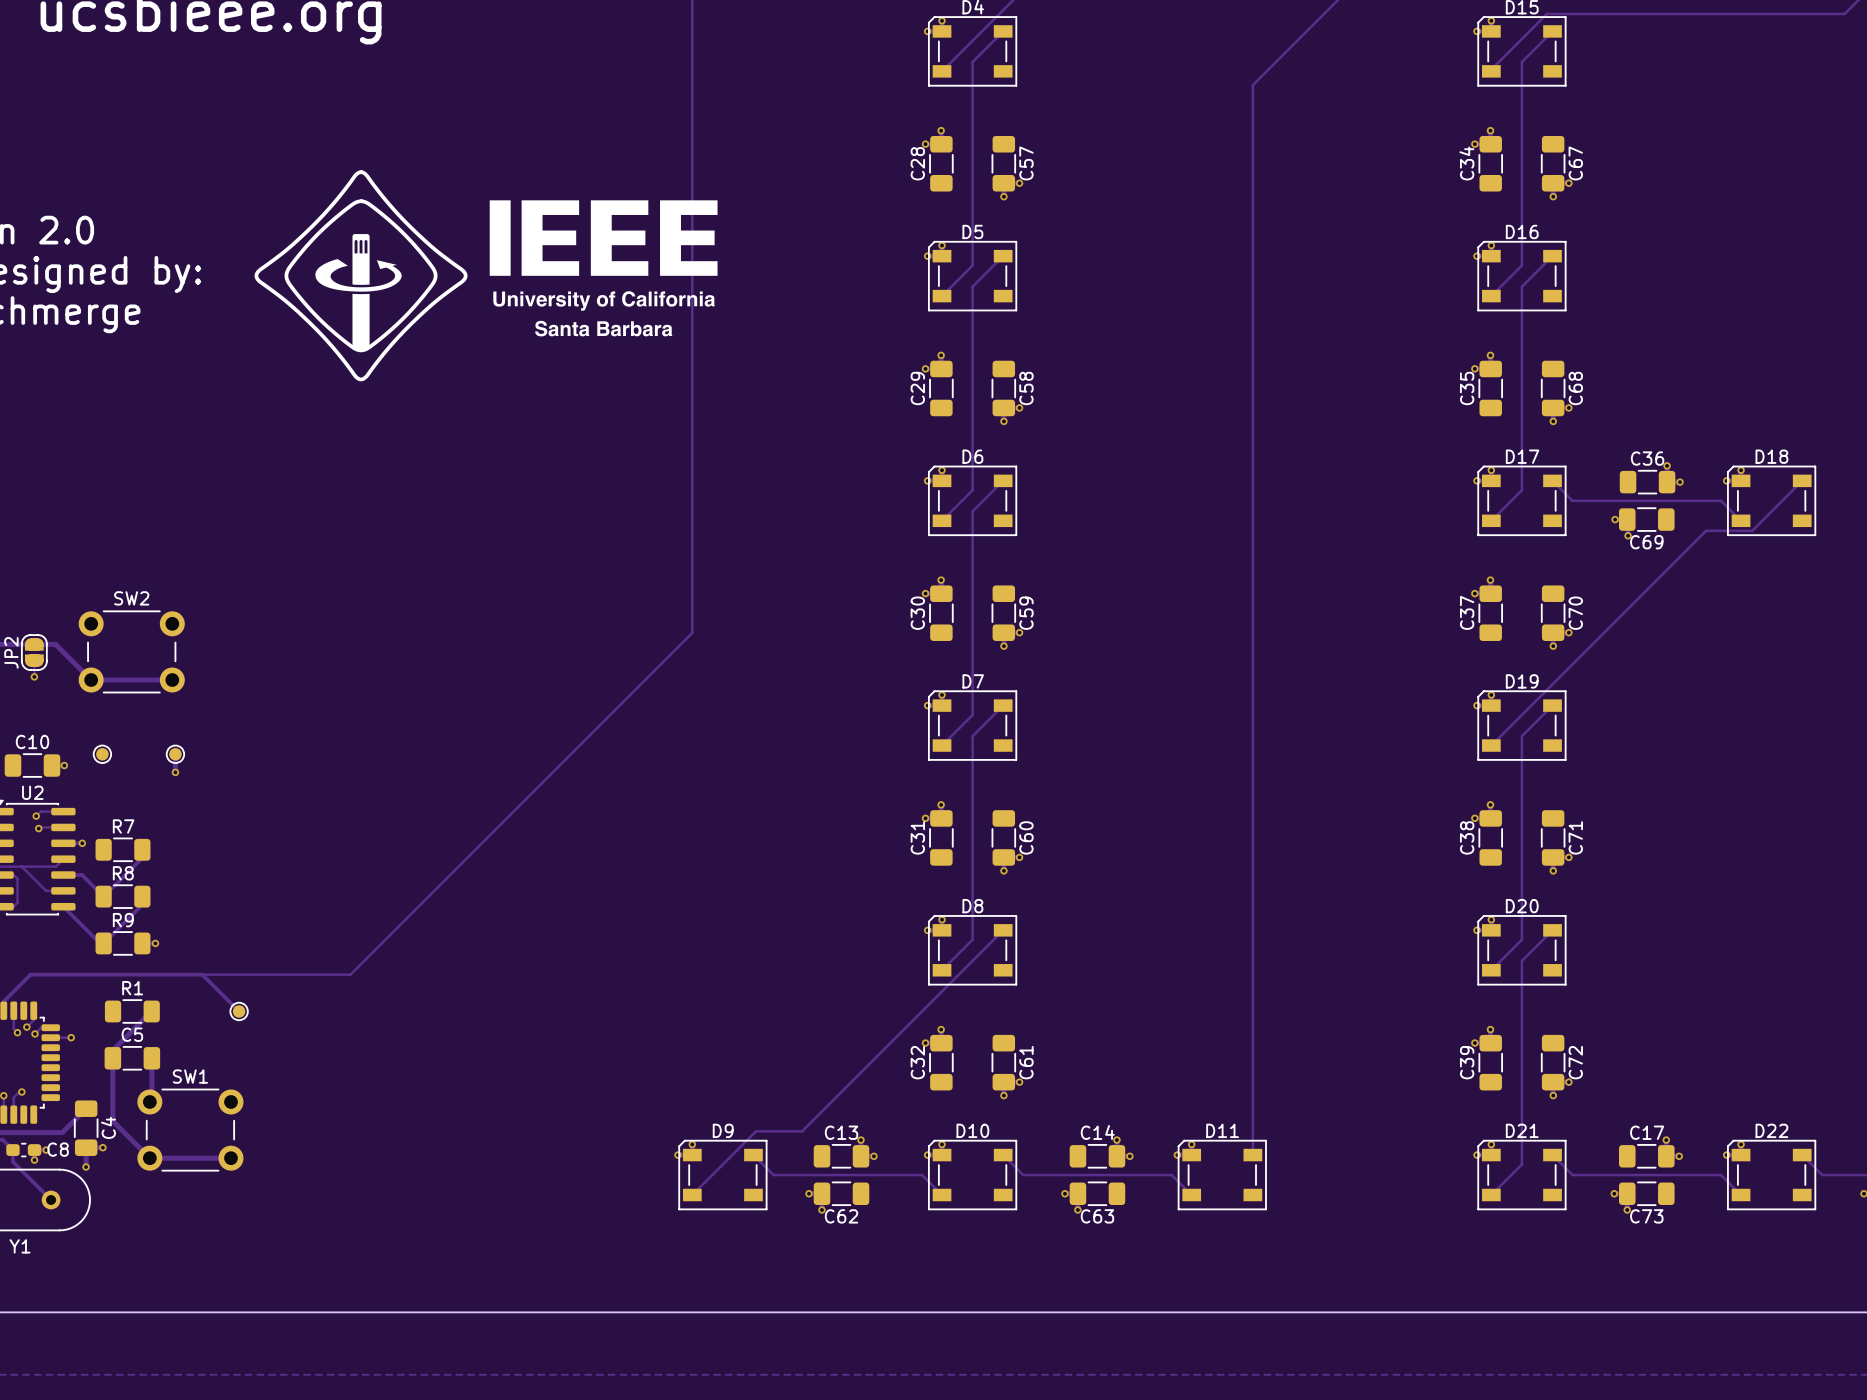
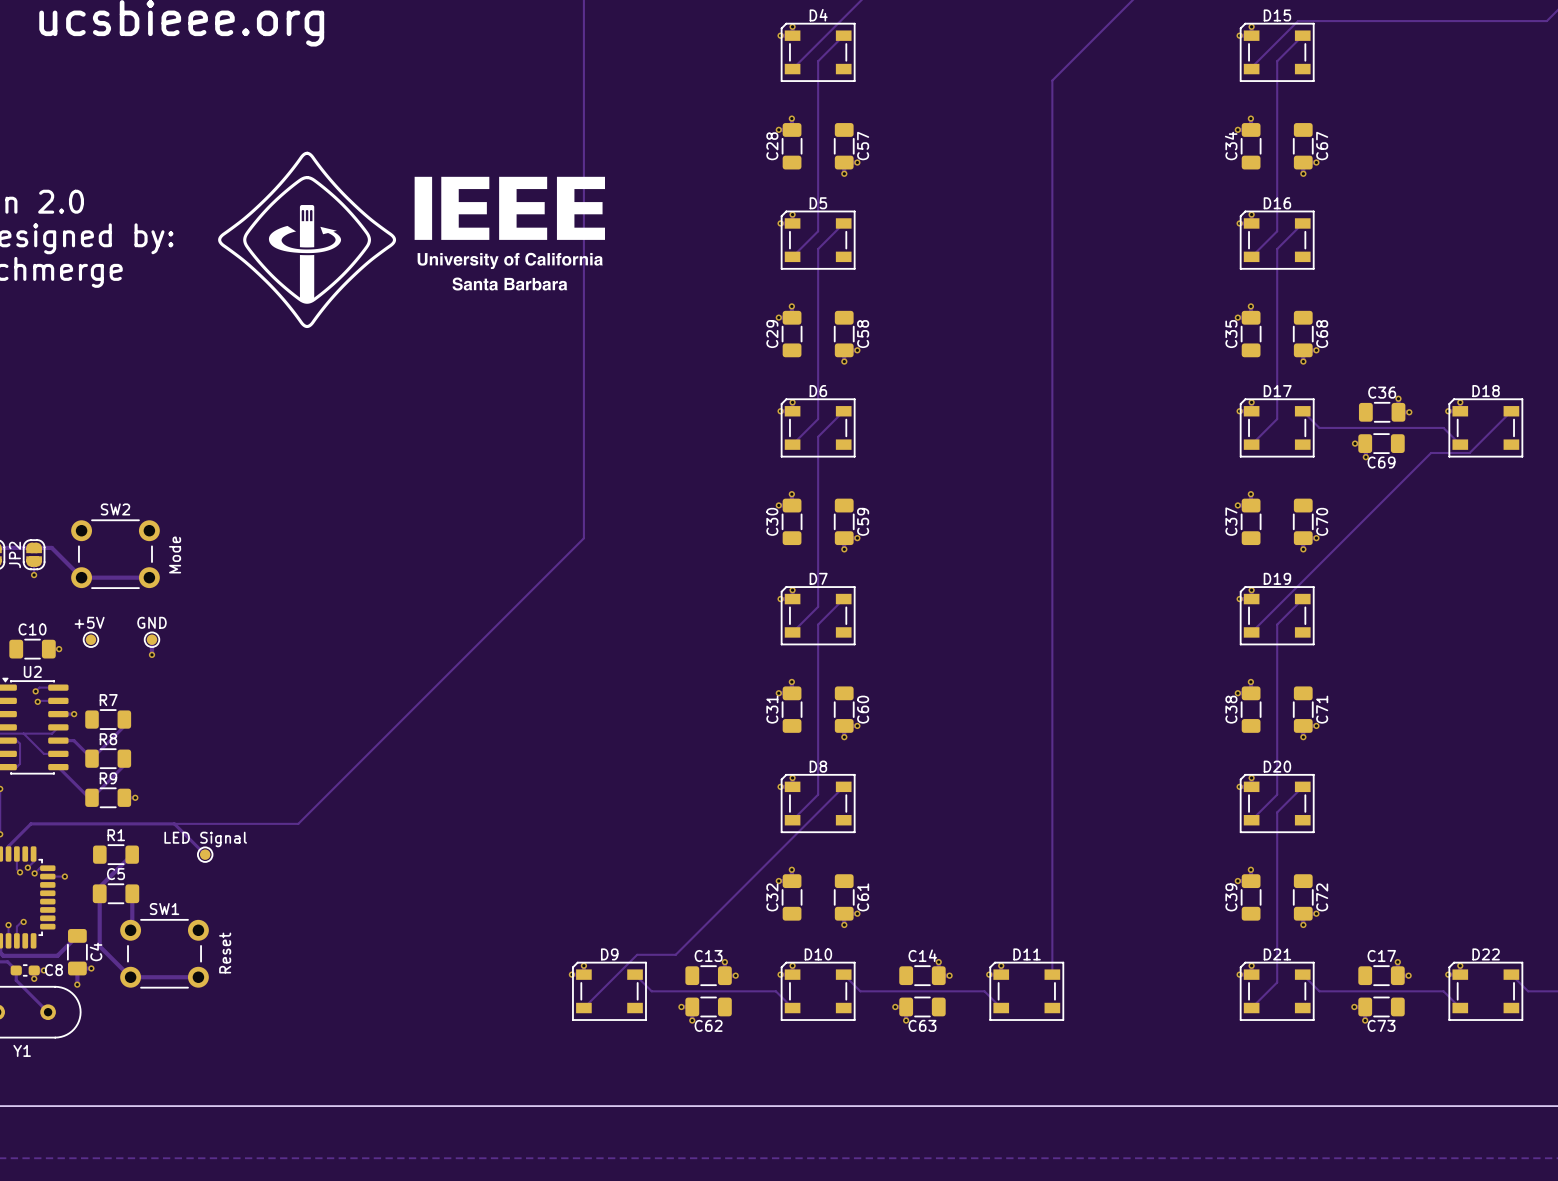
text: none -> Mode (175, 554)
text: none -> +5V (89, 622)
text: none -> GND (151, 622)
text: none -> LED Signal (205, 839)
text: none -> Reset (225, 953)

